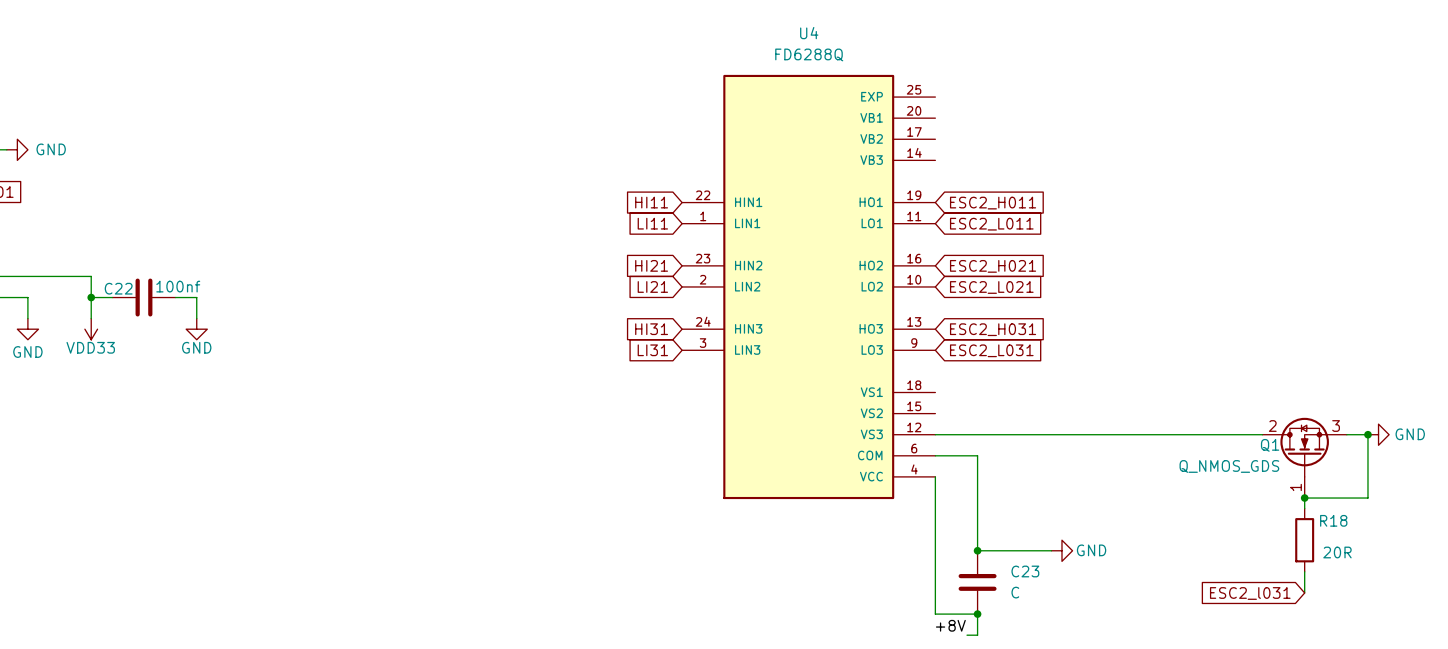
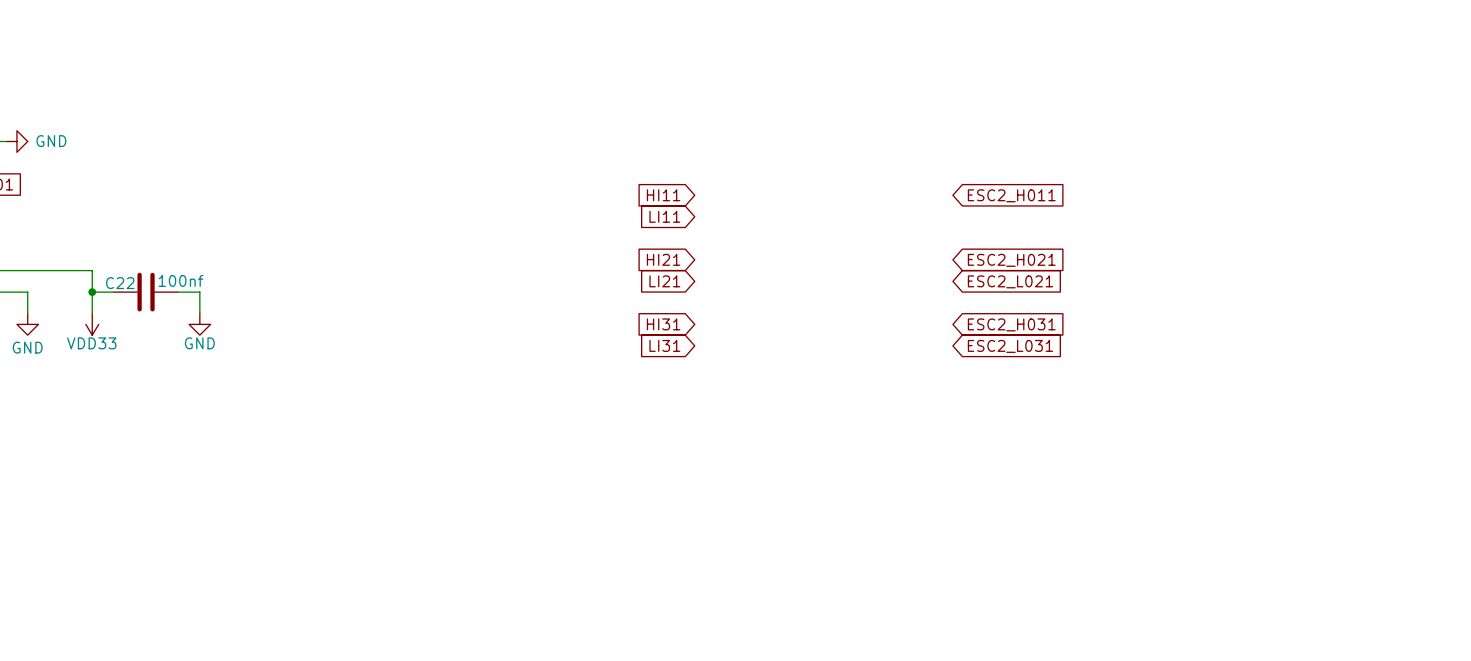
global label: ESC2_L011 (991, 224) -> none
U4: FD6288Q (808, 286) -> none
wire: (935, 434) (1262, 434) -> none
wire: (1346, 434) (1367, 434) (1367, 498) (1304, 498) (1304, 508) -> none
junction: (1367, 434) -> none
power symbol: GND (1378, 434) -> none
wire: (935, 455) (977, 455) (977, 550) (1051, 550) -> none
Q1: Q_NMOS_GDS (1304, 457) -> none
wire: (935, 476) (935, 614) (977, 614) (977, 635) (967, 635) -> none
junction: (1304, 498) -> none
R18: 20R (1304, 540) -> none
junction: (977, 550) -> none
power symbol: GND (1061, 550) -> none
wire: (1304, 571) (1304, 592) -> none
C23: C (977, 582) -> none
global label: ESC2_l031 (1250, 593) -> none
junction: (977, 614) -> none
label: +8V (950, 625) -> none

